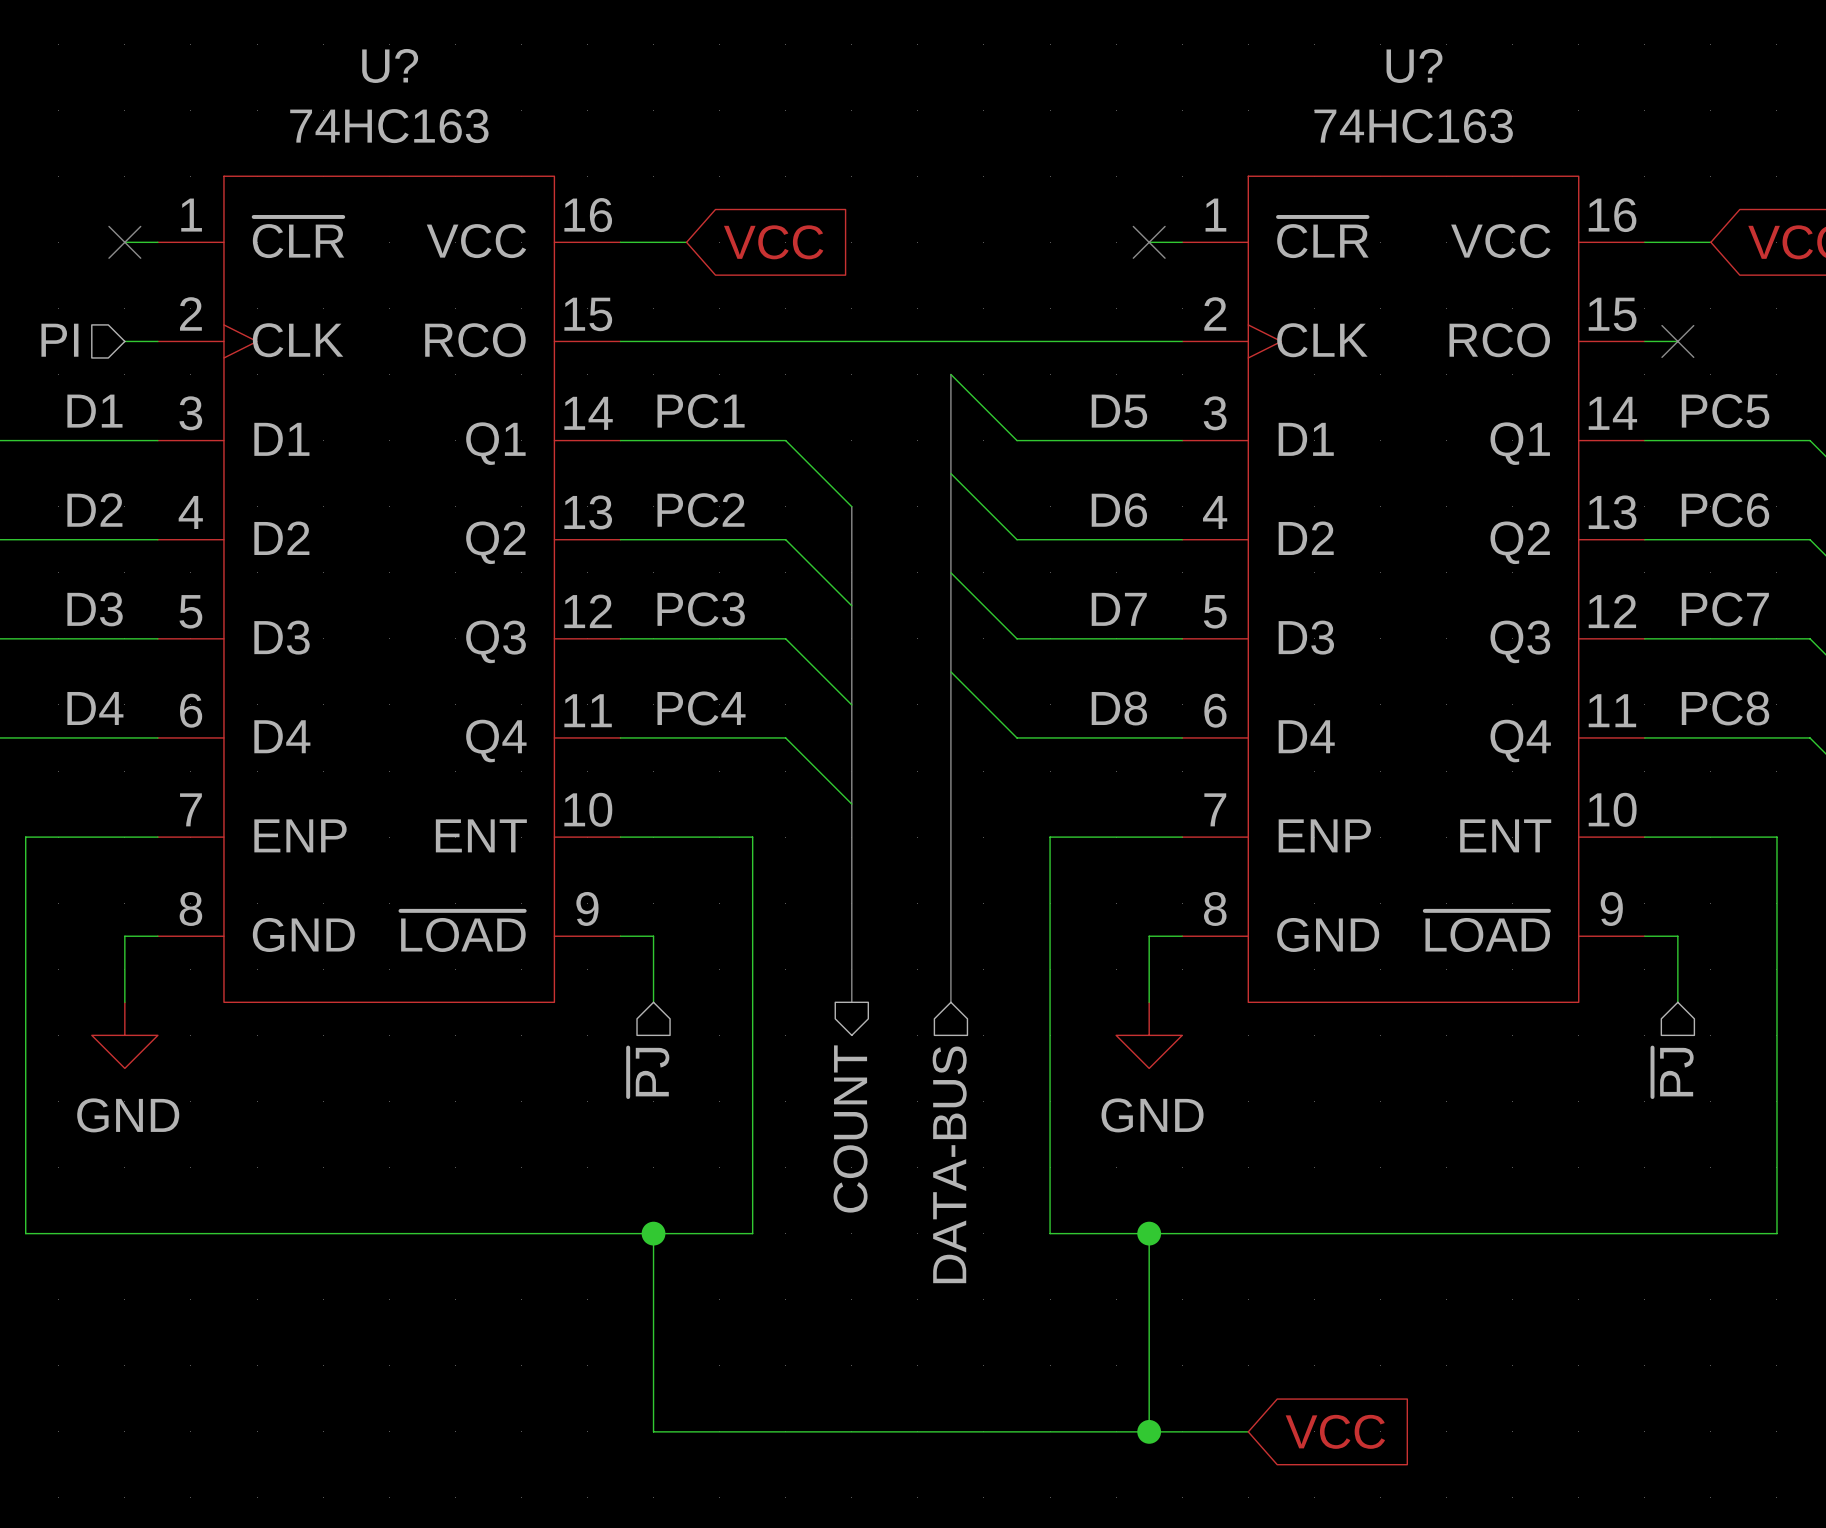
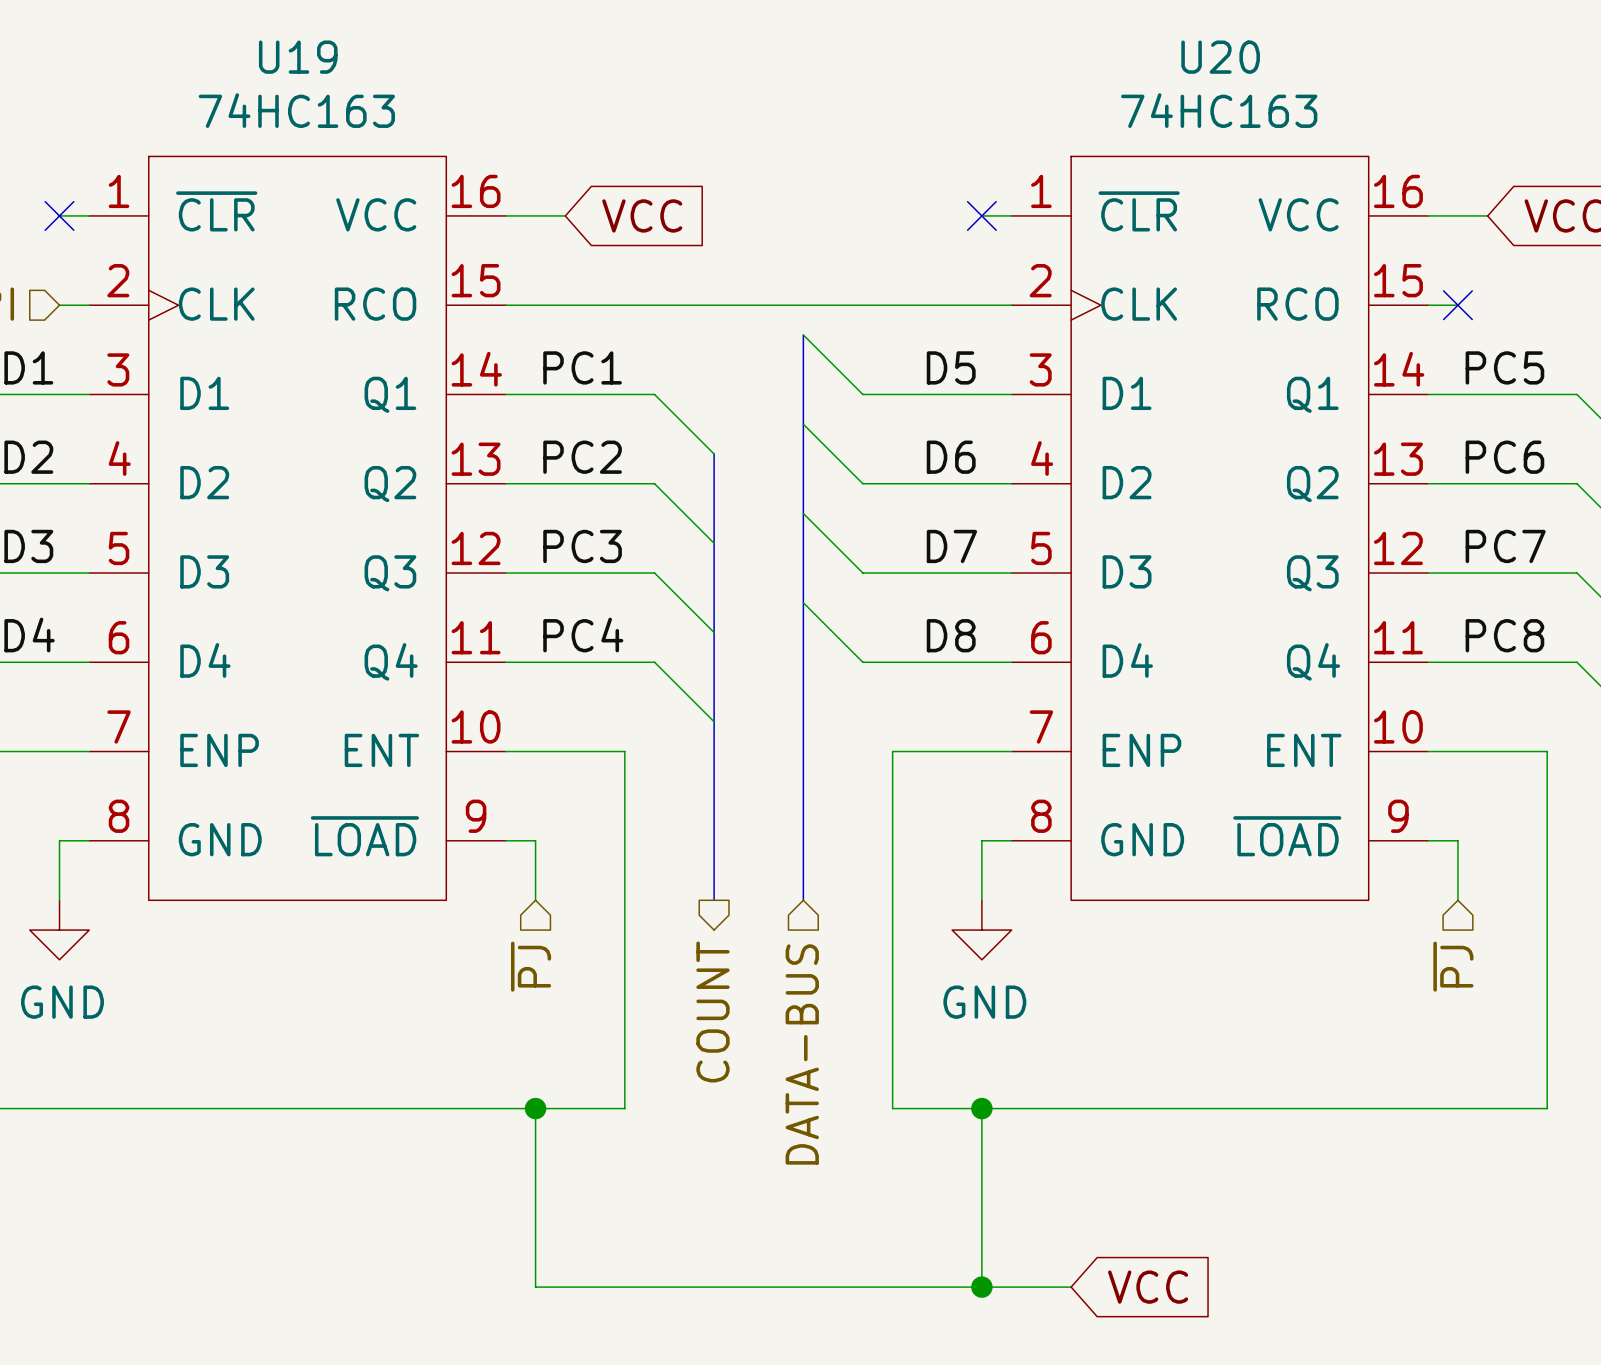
U? name: U? (390, 65) -> U19 (298, 57)
U? name: U? (1414, 65) -> U20 (1220, 57)

